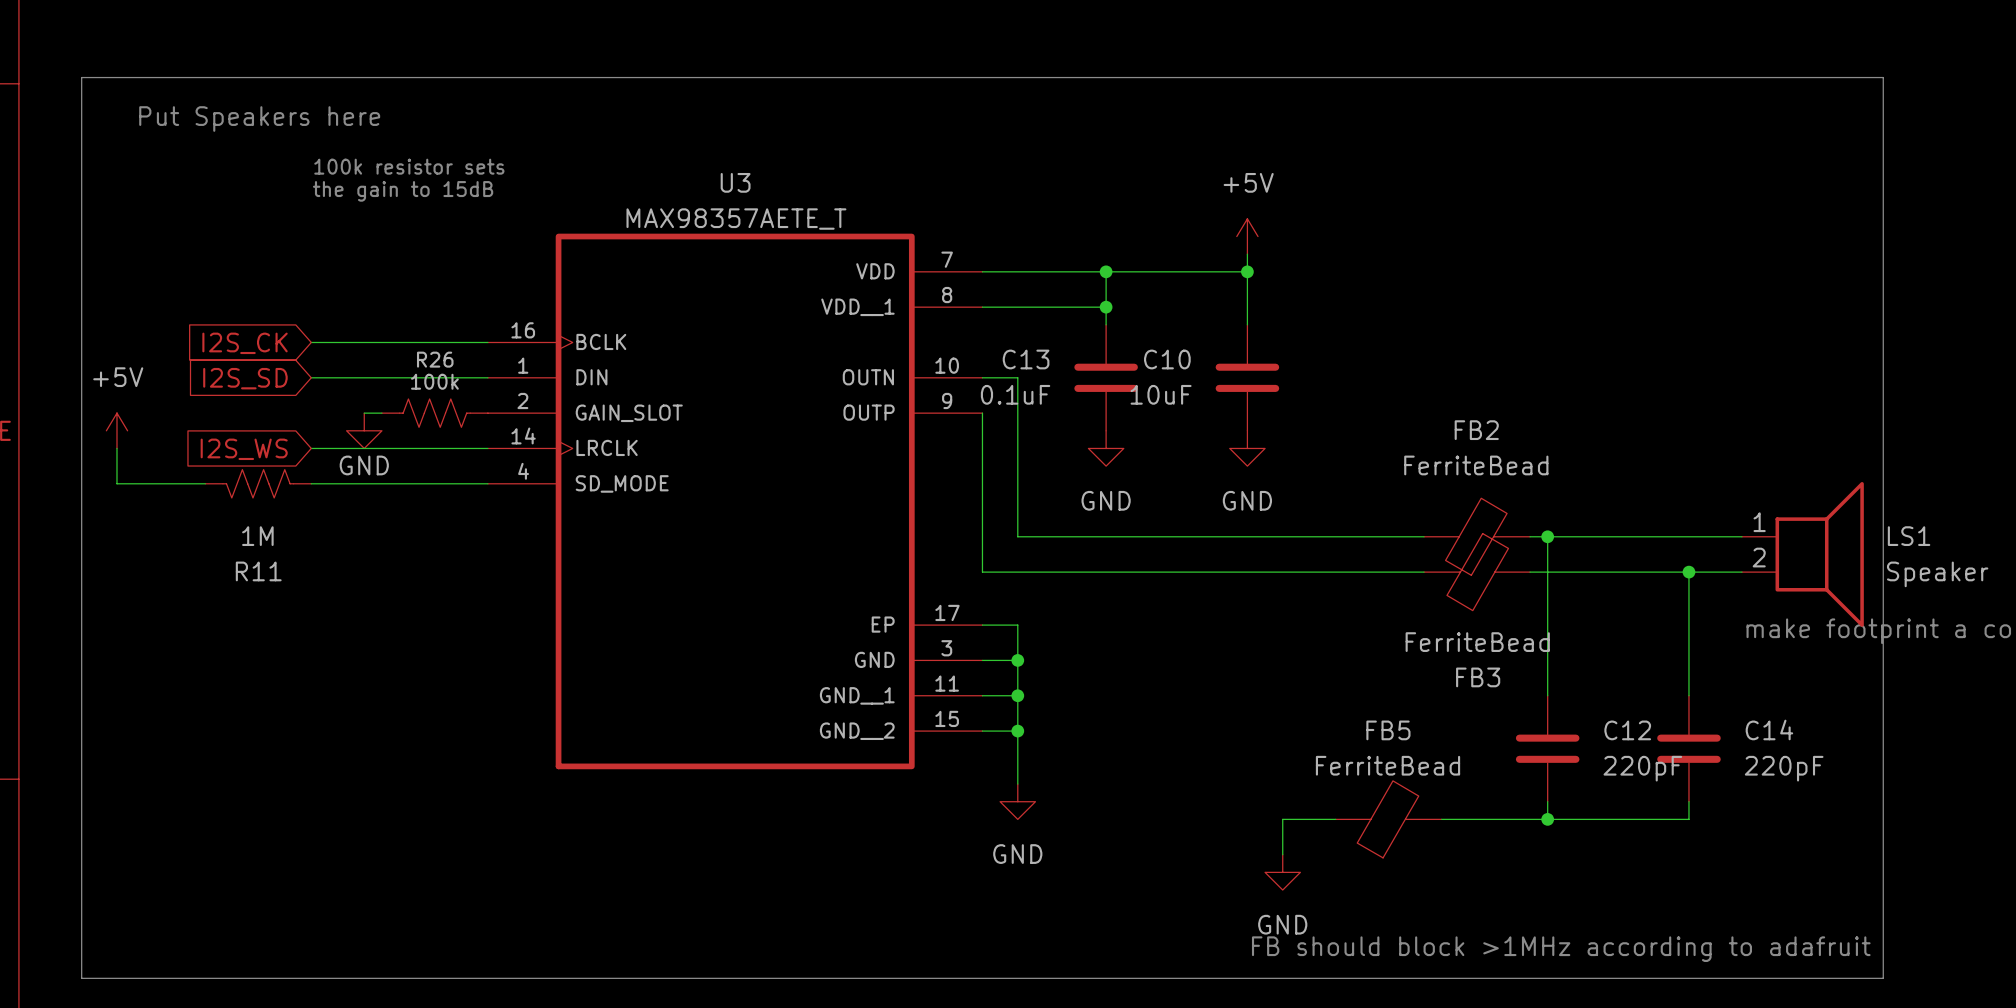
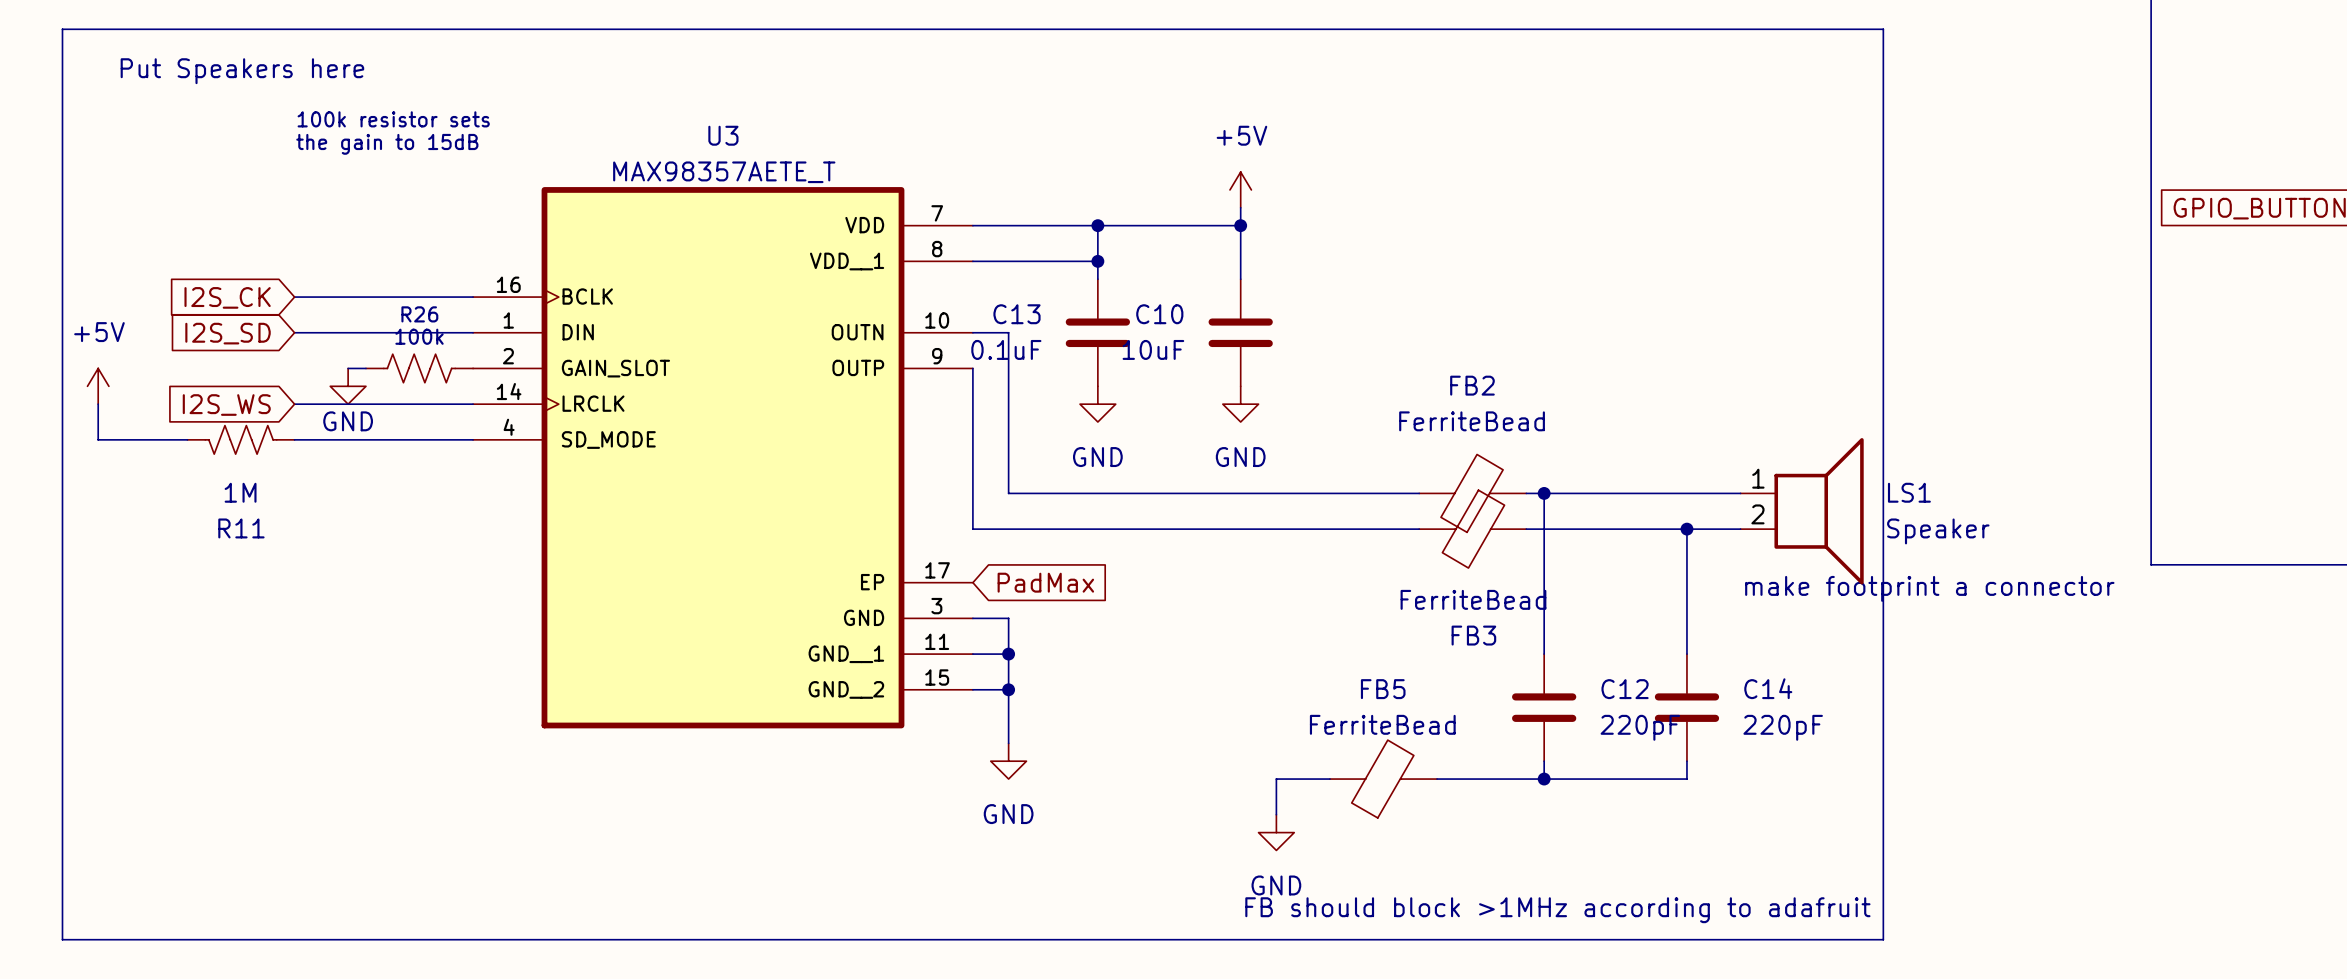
wire: (982, 625) (1017, 625) (1017, 660) -> none
global label: none -> PadMax (1045, 582)
junction: (1017, 660) -> none

